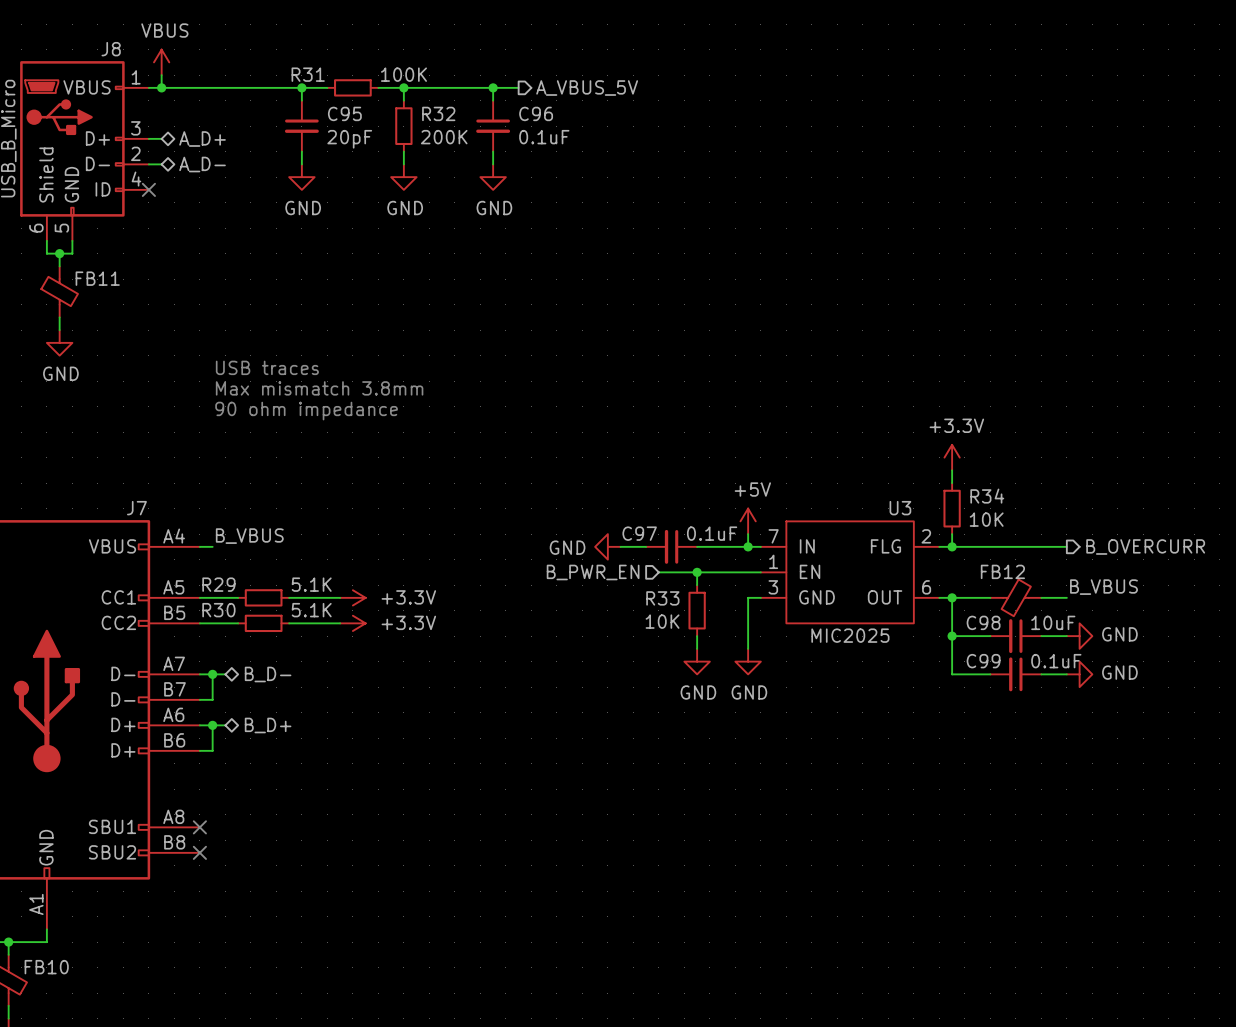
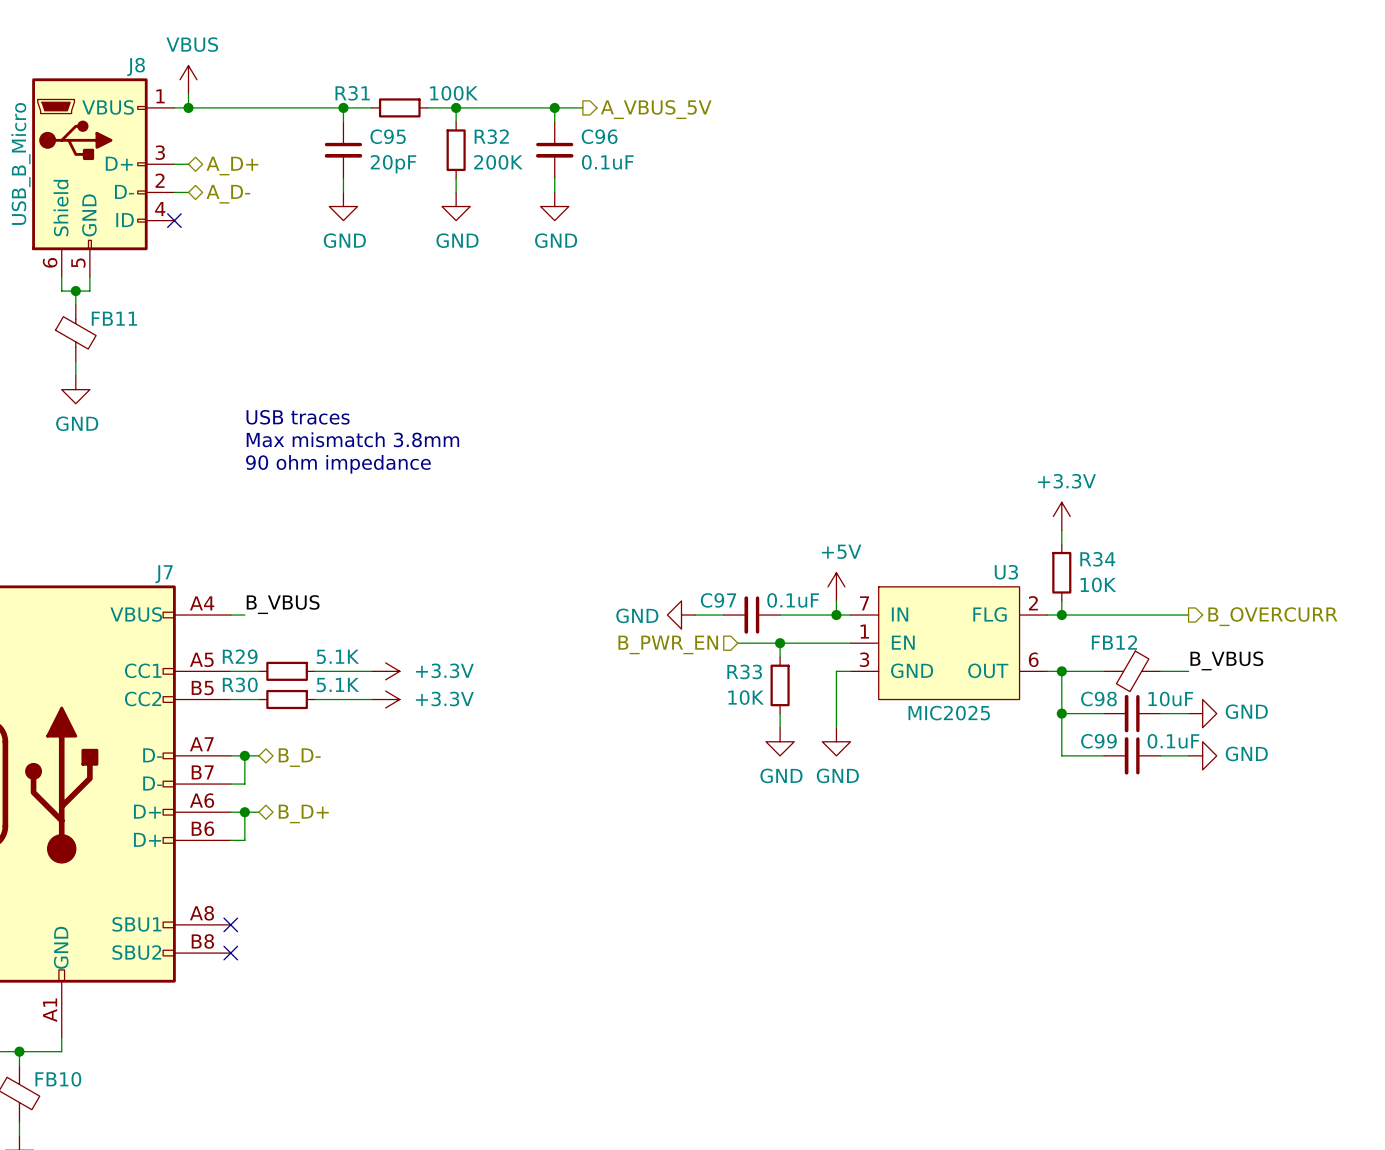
R29 position: (263, 597) -> (287, 671)
power symbol position: +3.3V (352, 597) -> +3.3V (385, 671)
R30 position: (263, 623) -> (287, 699)
power symbol position: +3.3V (352, 623) -> +3.3V (385, 699)

